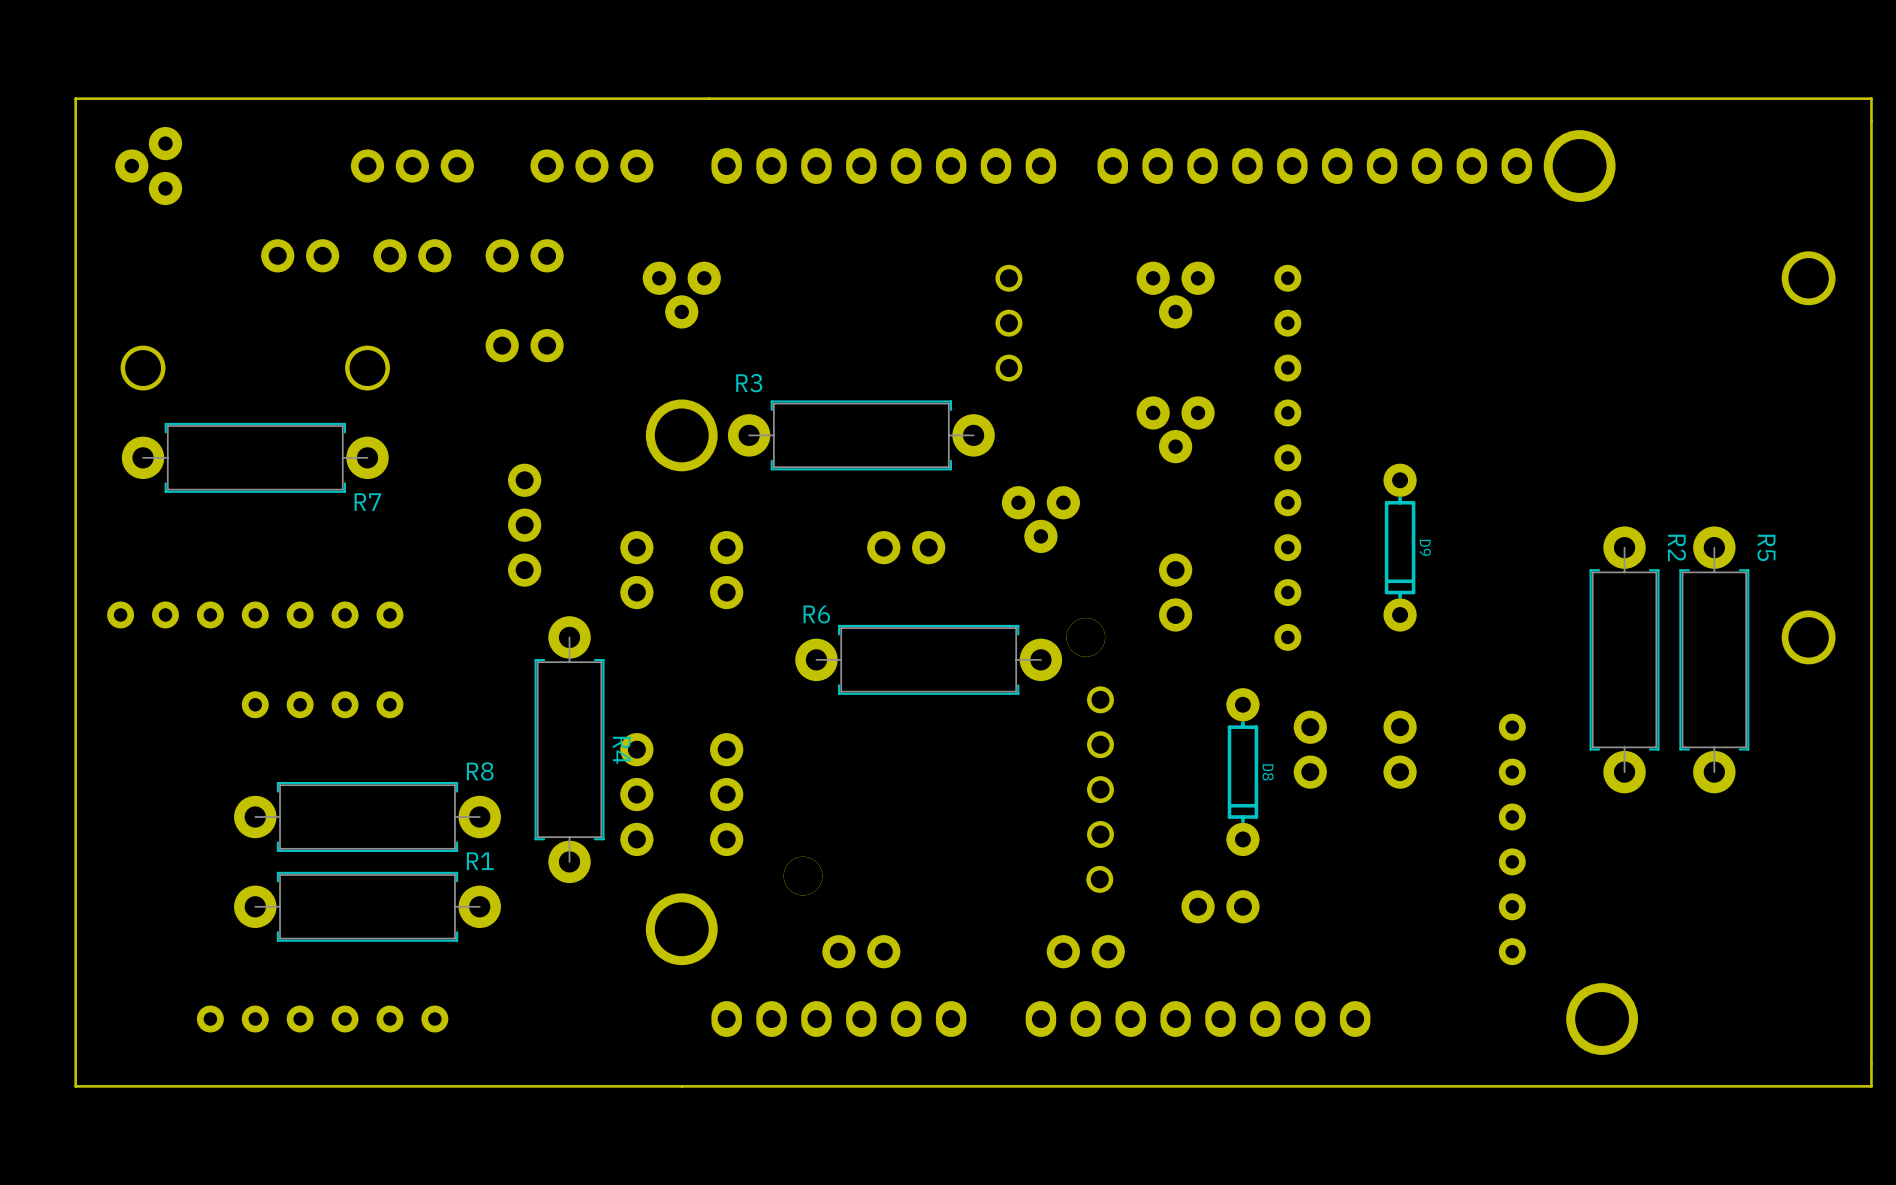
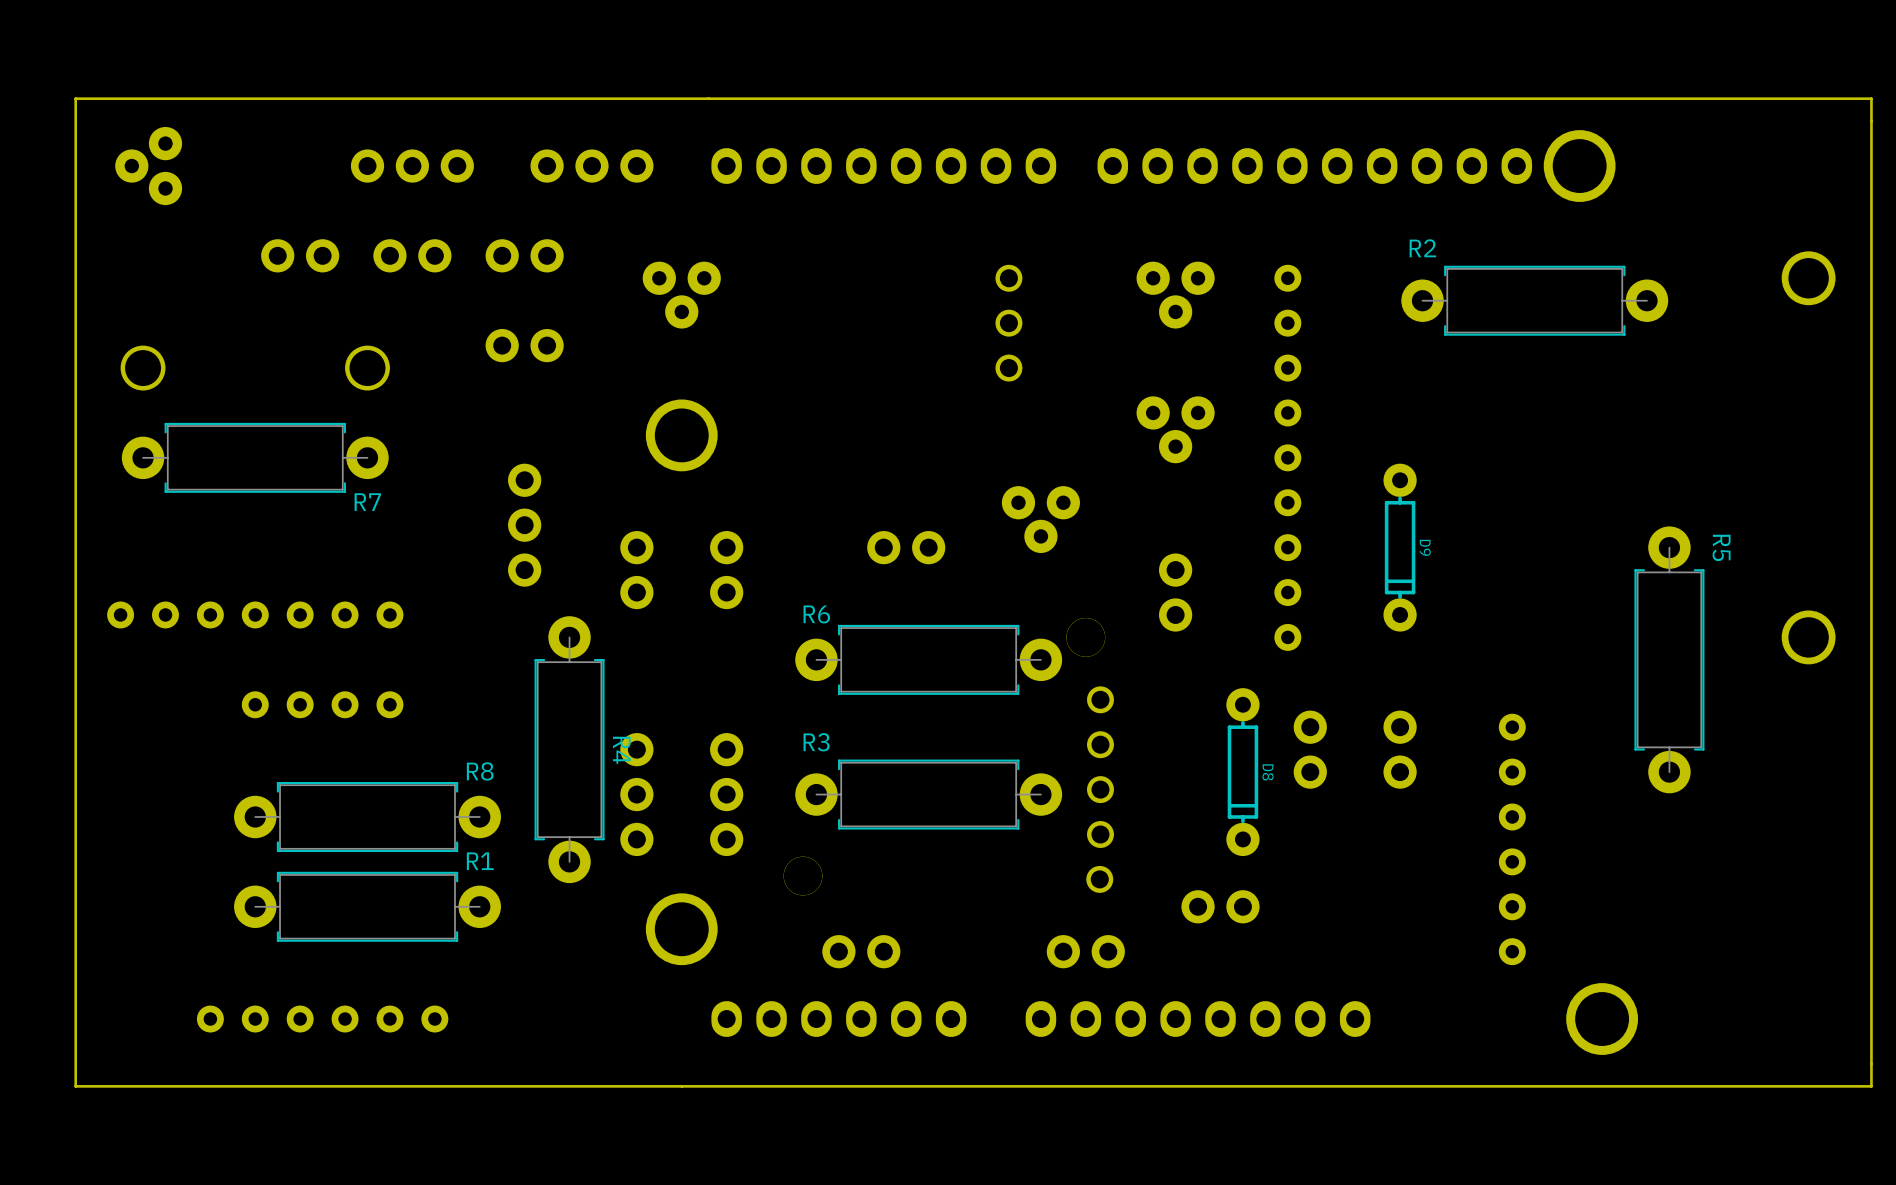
R3 position: (861, 435) -> (928, 794)
R2 name position: R2 (1676, 547) -> R2 (1422, 248)
R2 rotation: 0° (1624, 659) -> 90° clockwise (1534, 300)
R2 position: (1624, 659) -> (1534, 300)
R5 position: (1714, 659) -> (1669, 659)

